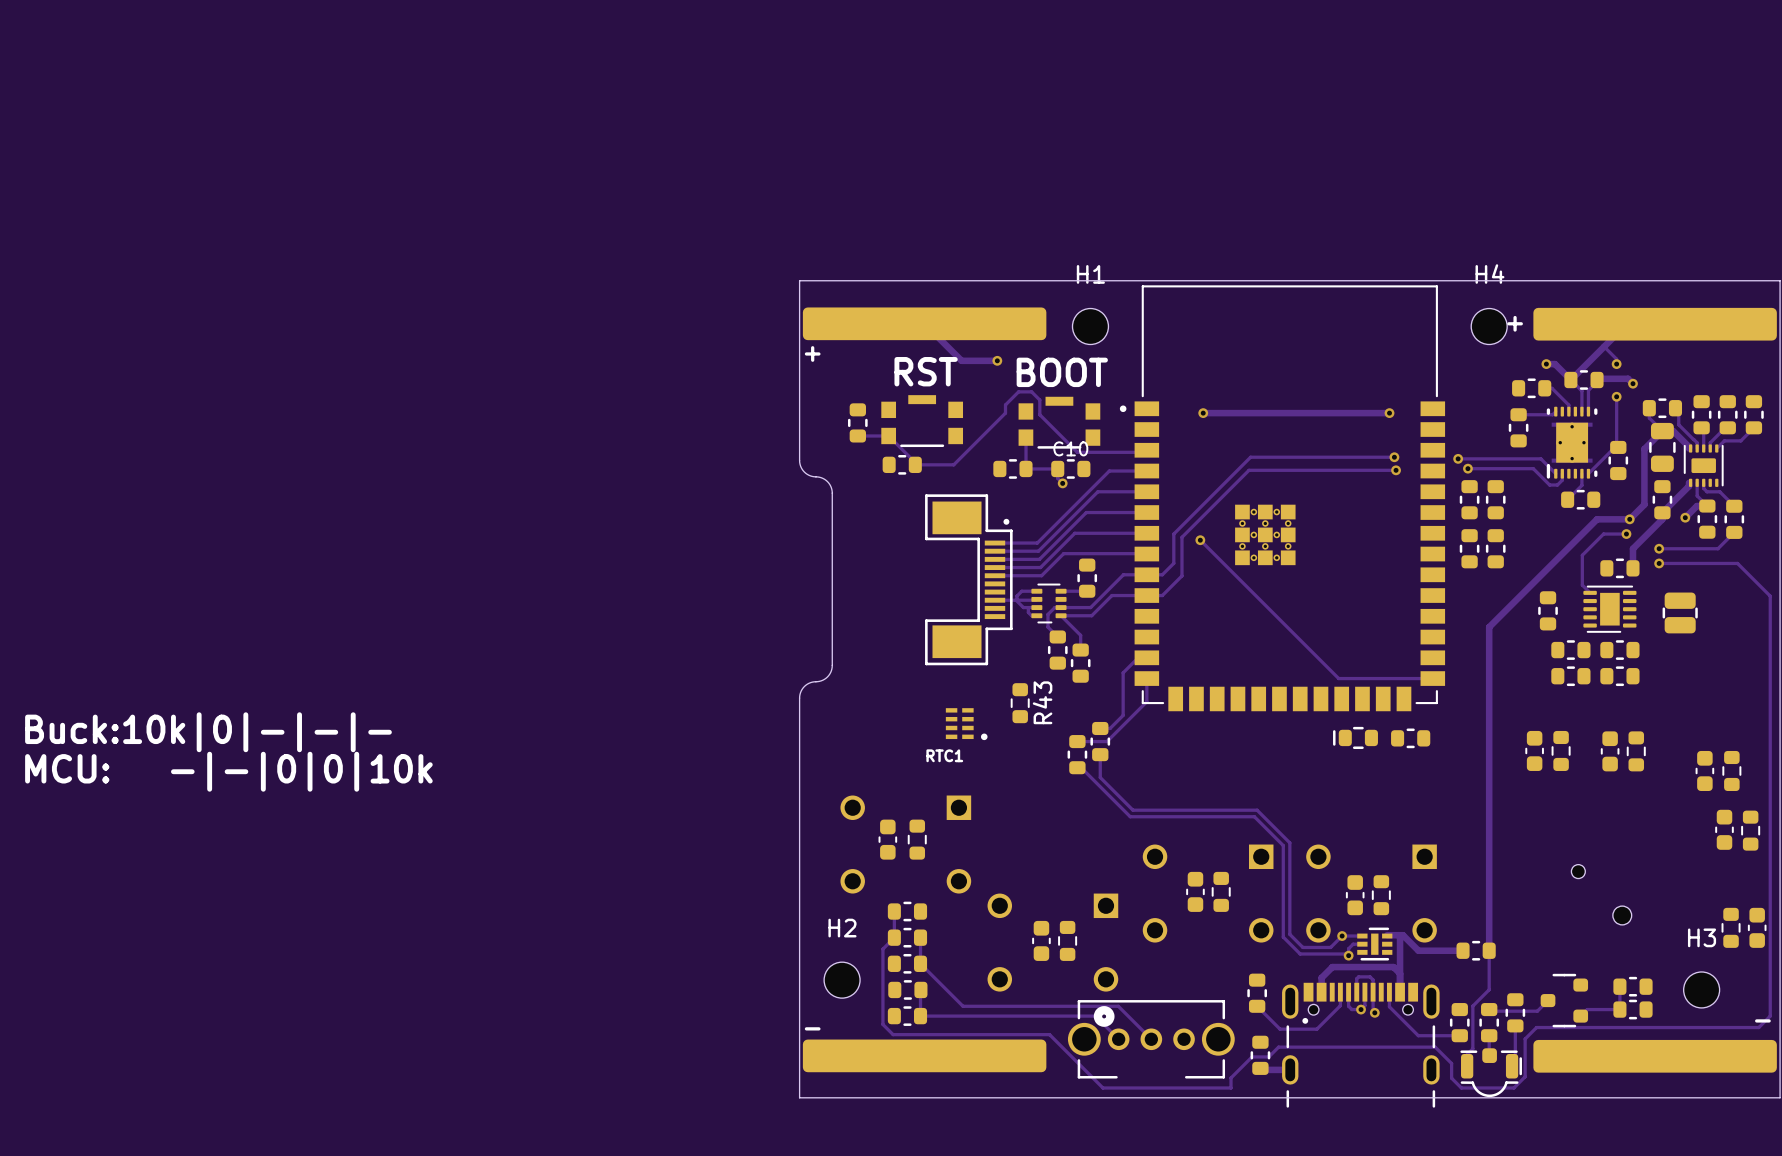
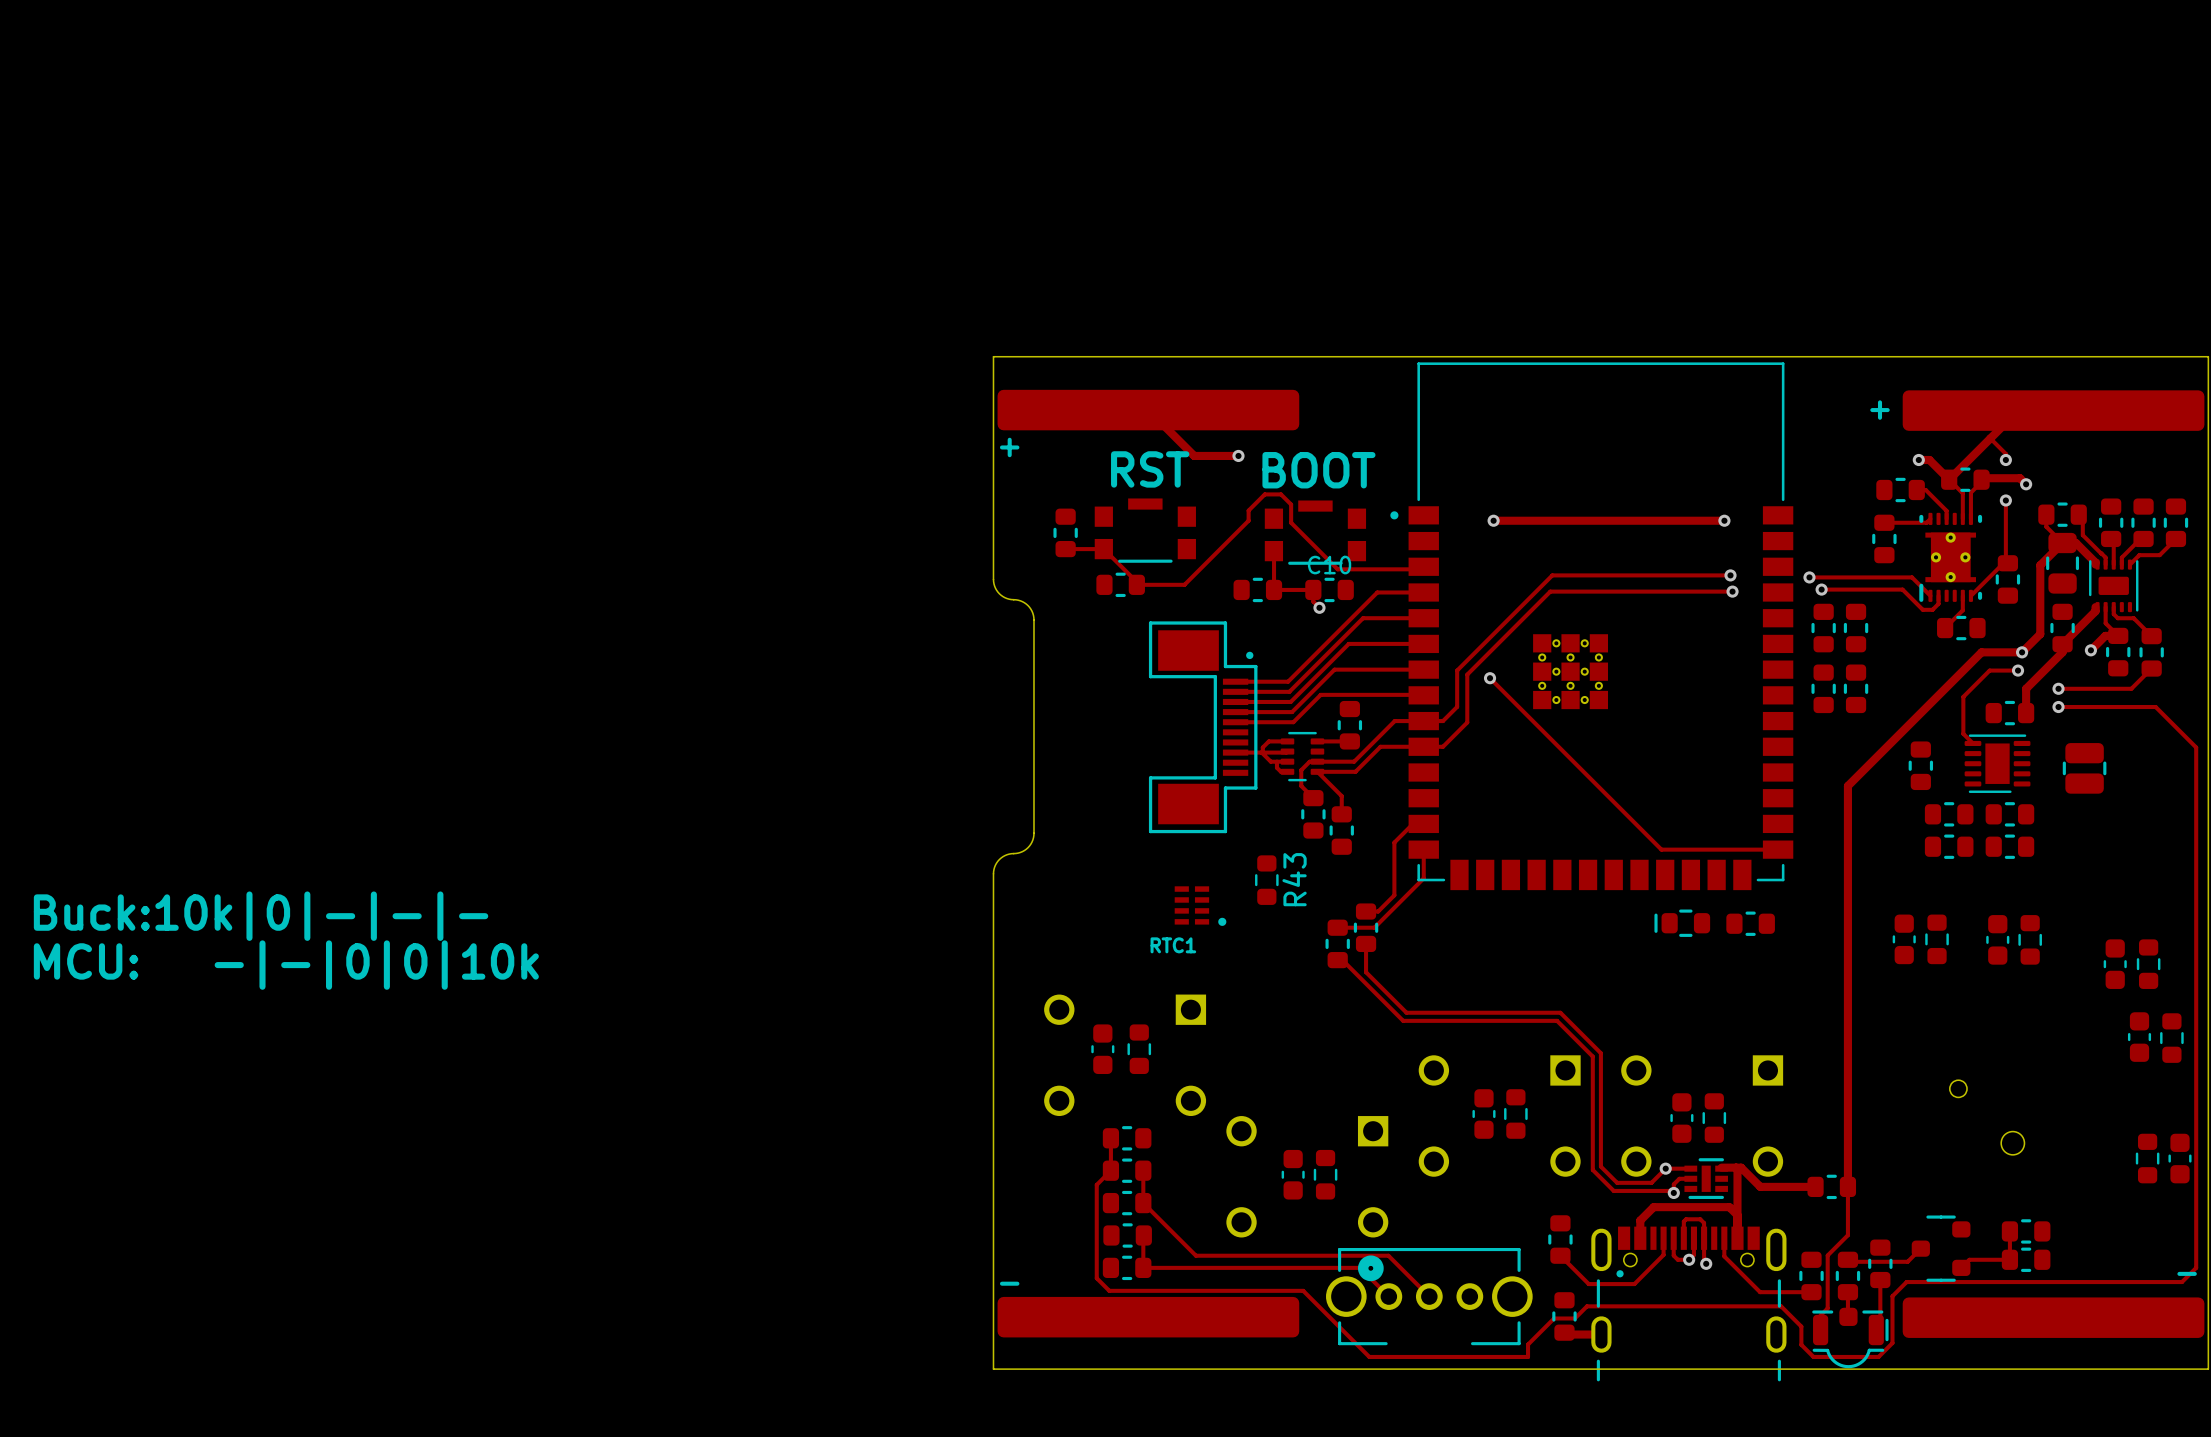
H1: (1090, 326) -> none
H4: (1489, 326) -> none
H2: (842, 980) -> none
H3: (1701, 989) -> none

